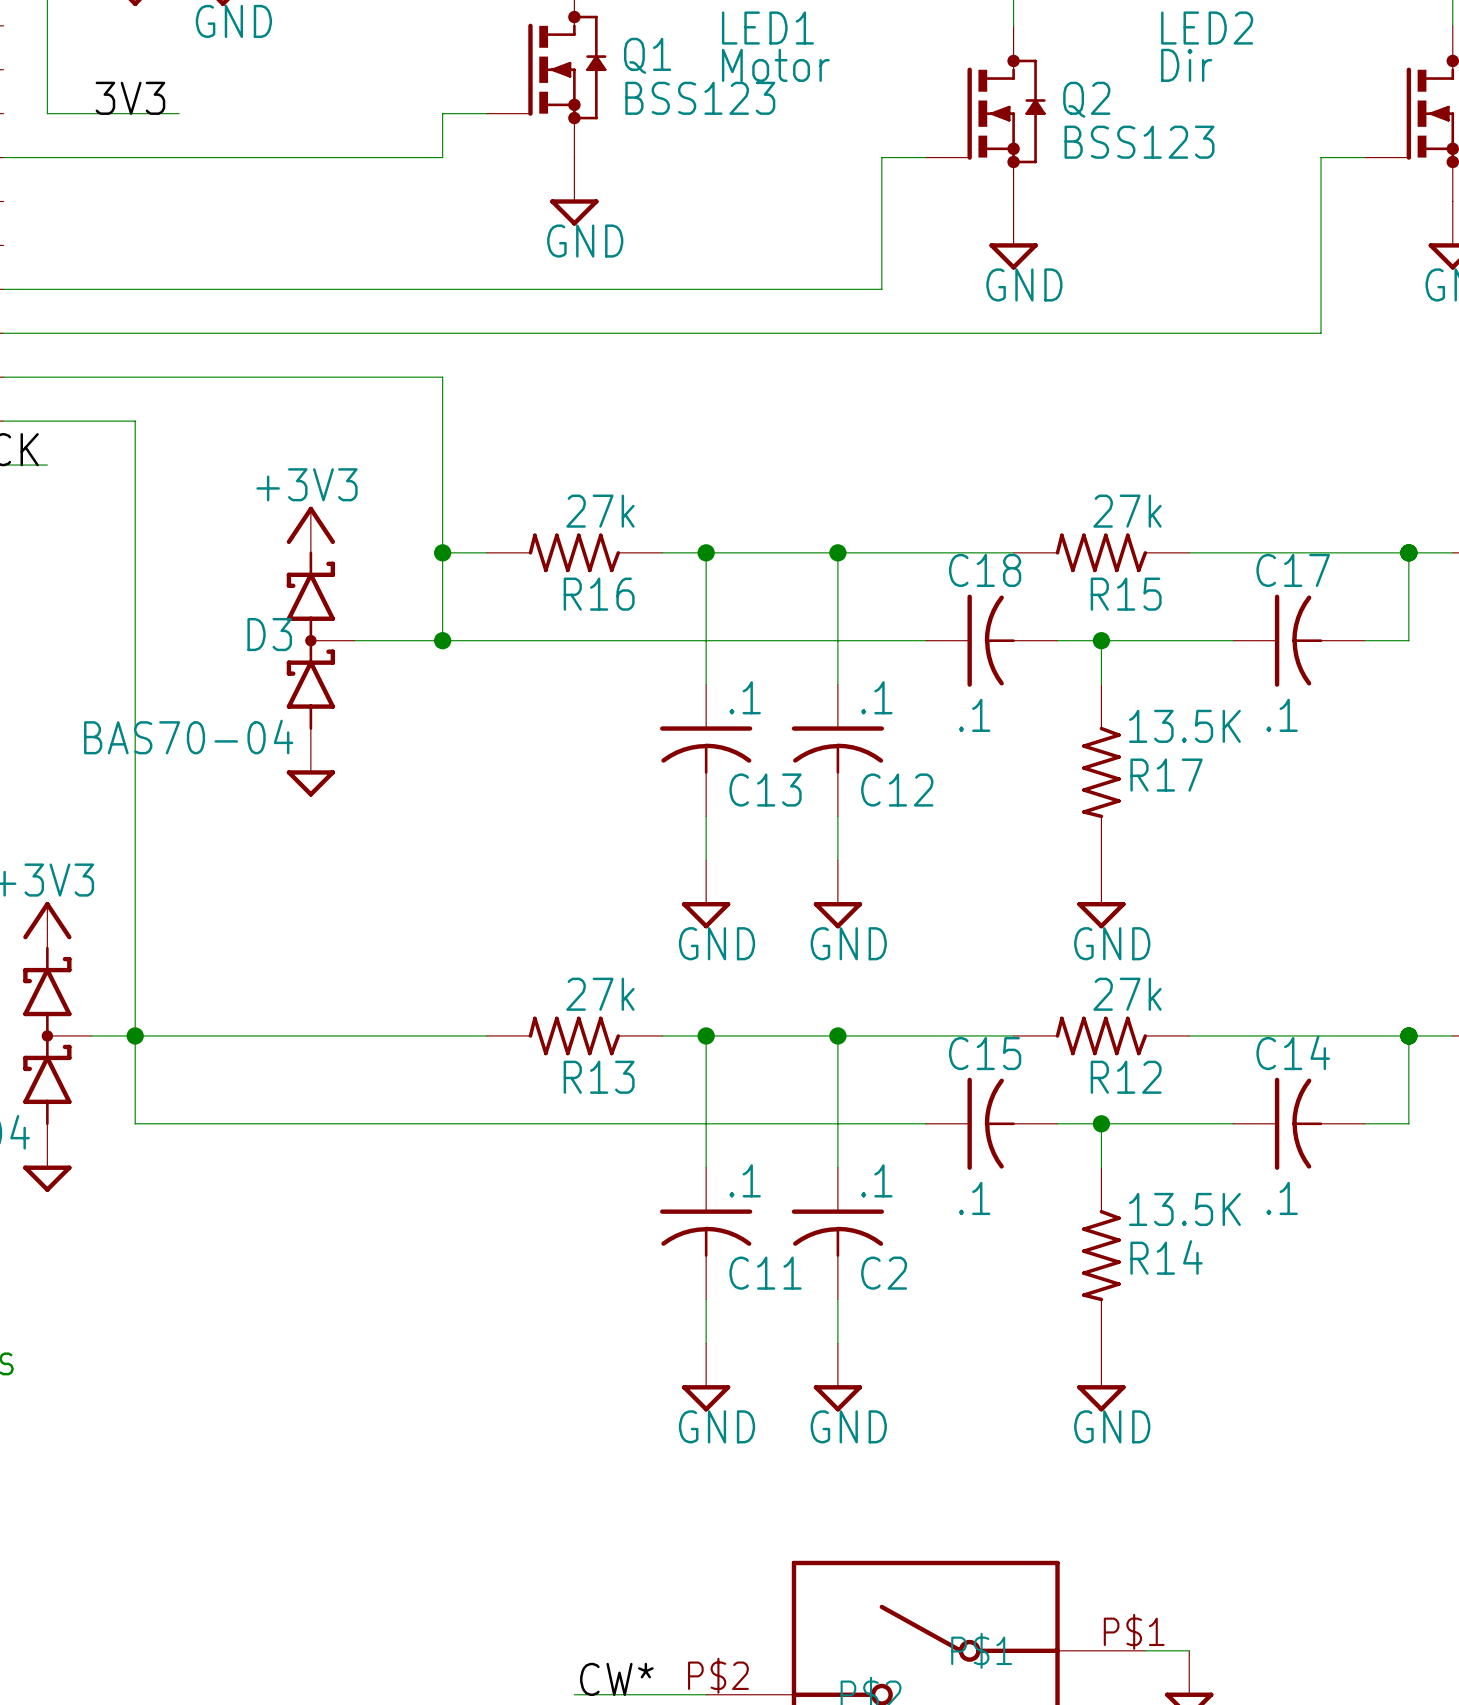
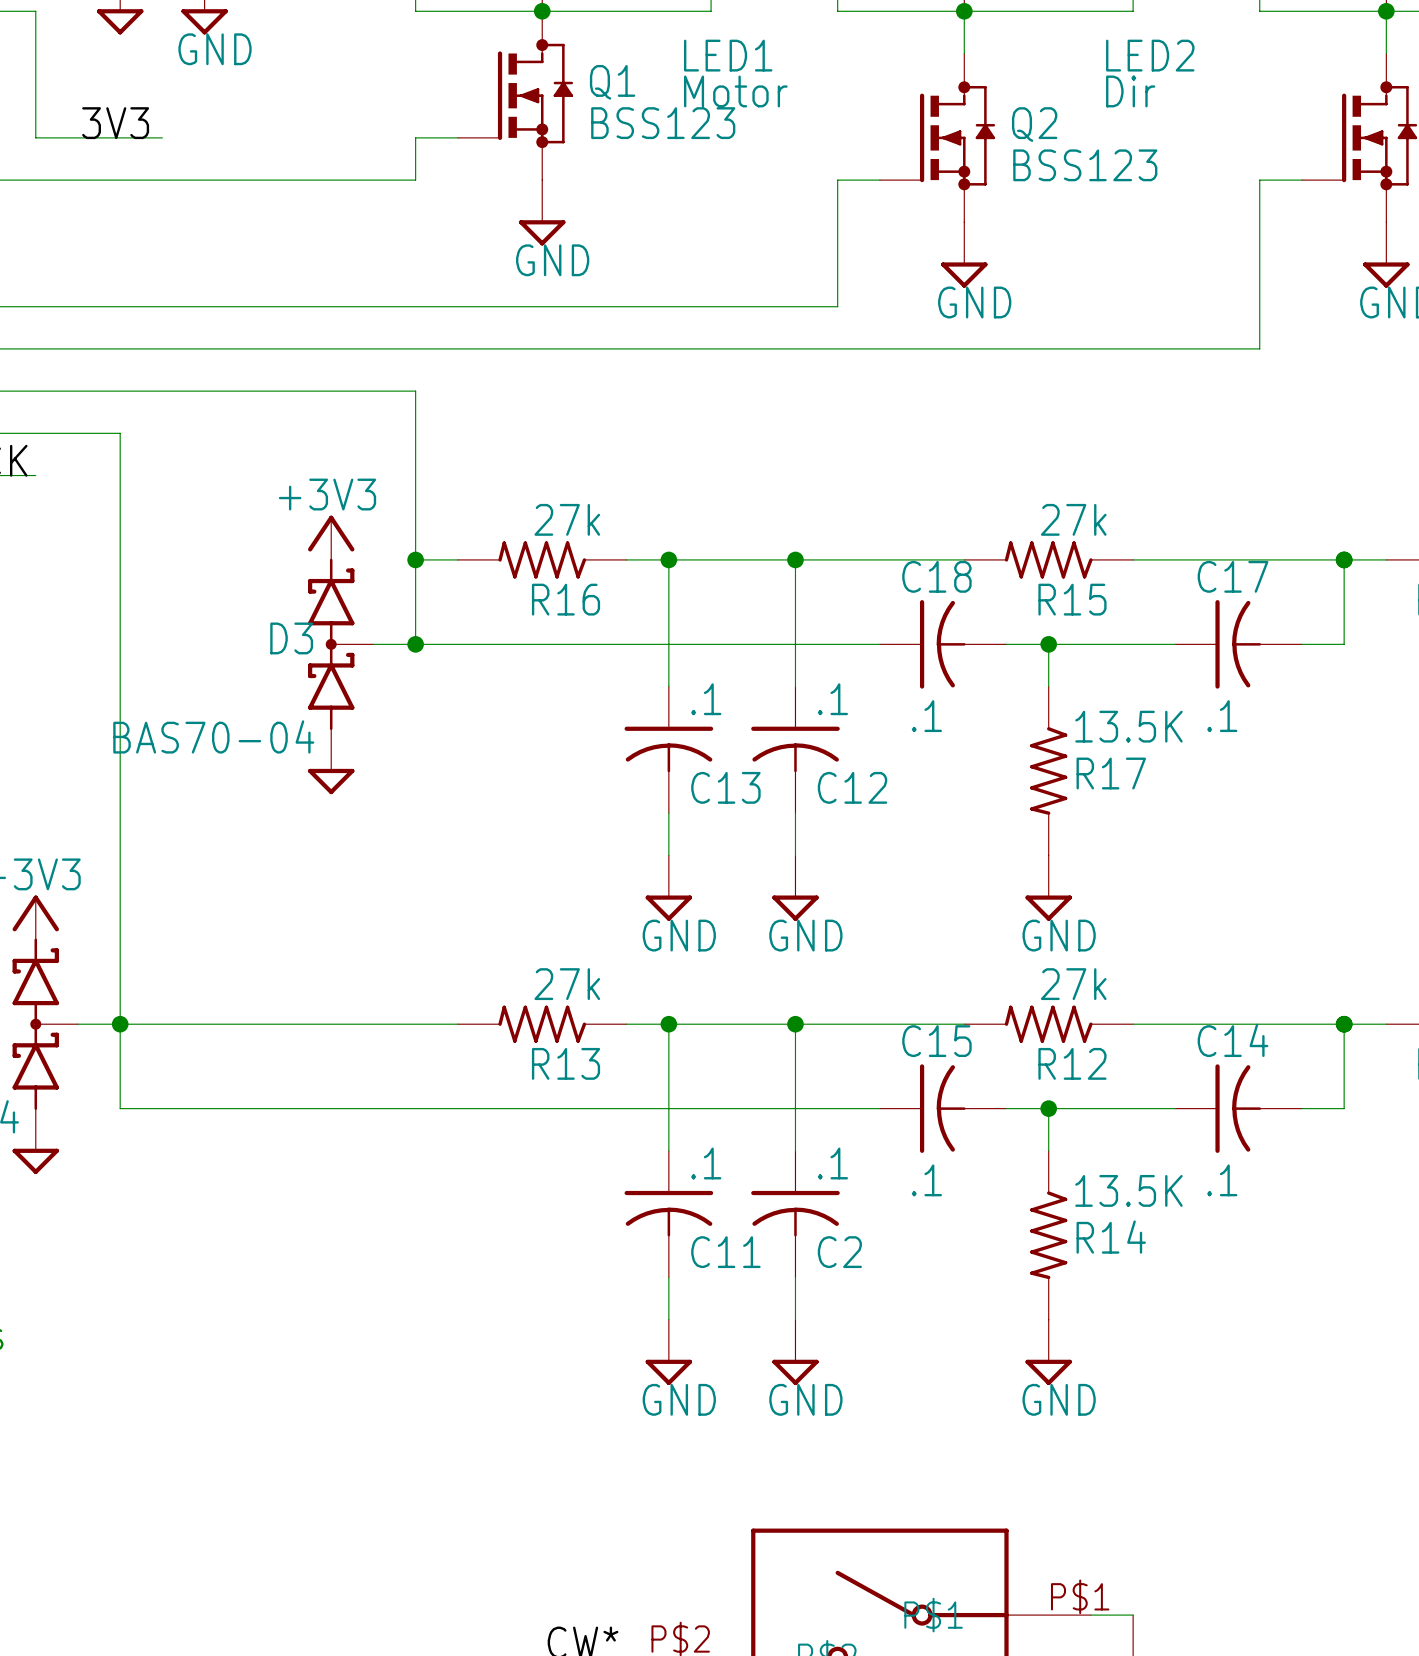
power symbol position: +3V3 (310, 529) -> +3V3 (331, 537)
D3 position: (320, 640) -> (340, 644)
power symbol position: (310, 762) -> (331, 761)

